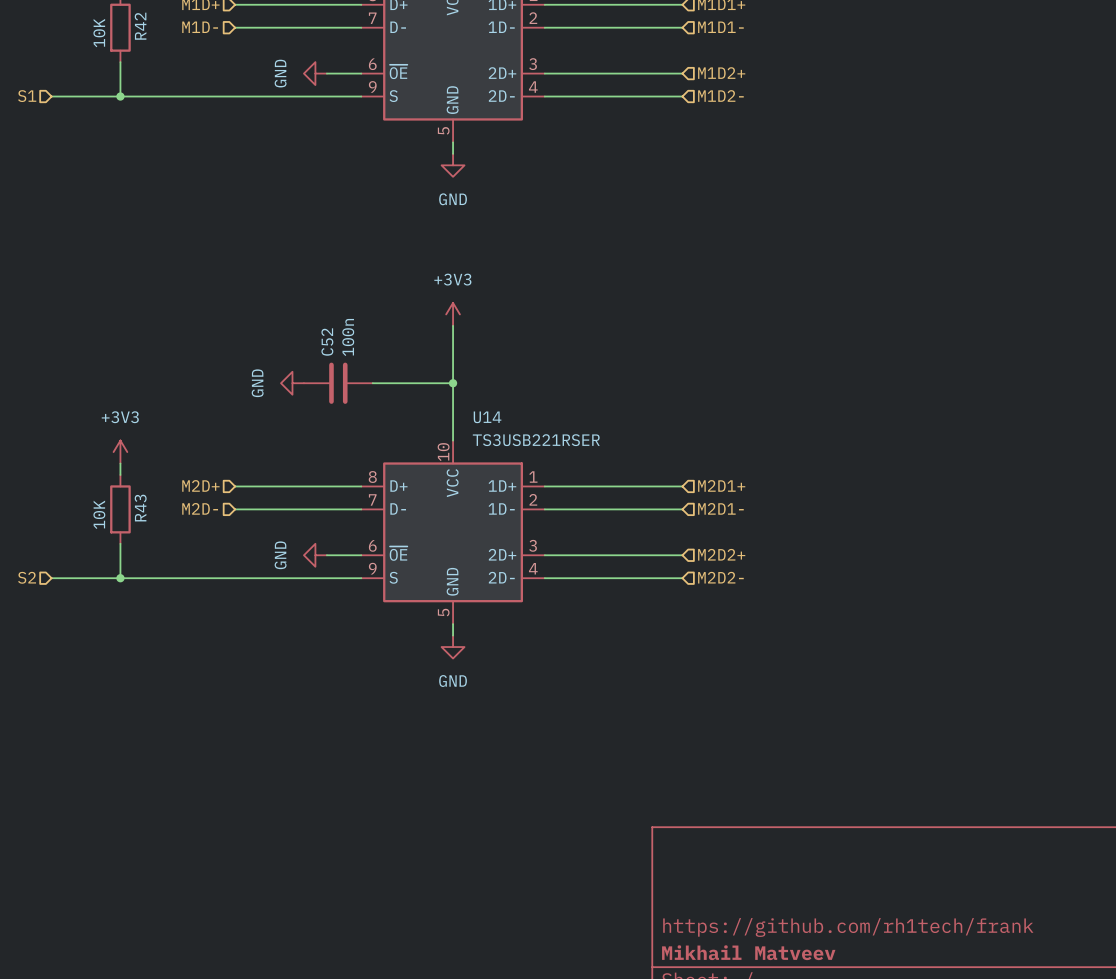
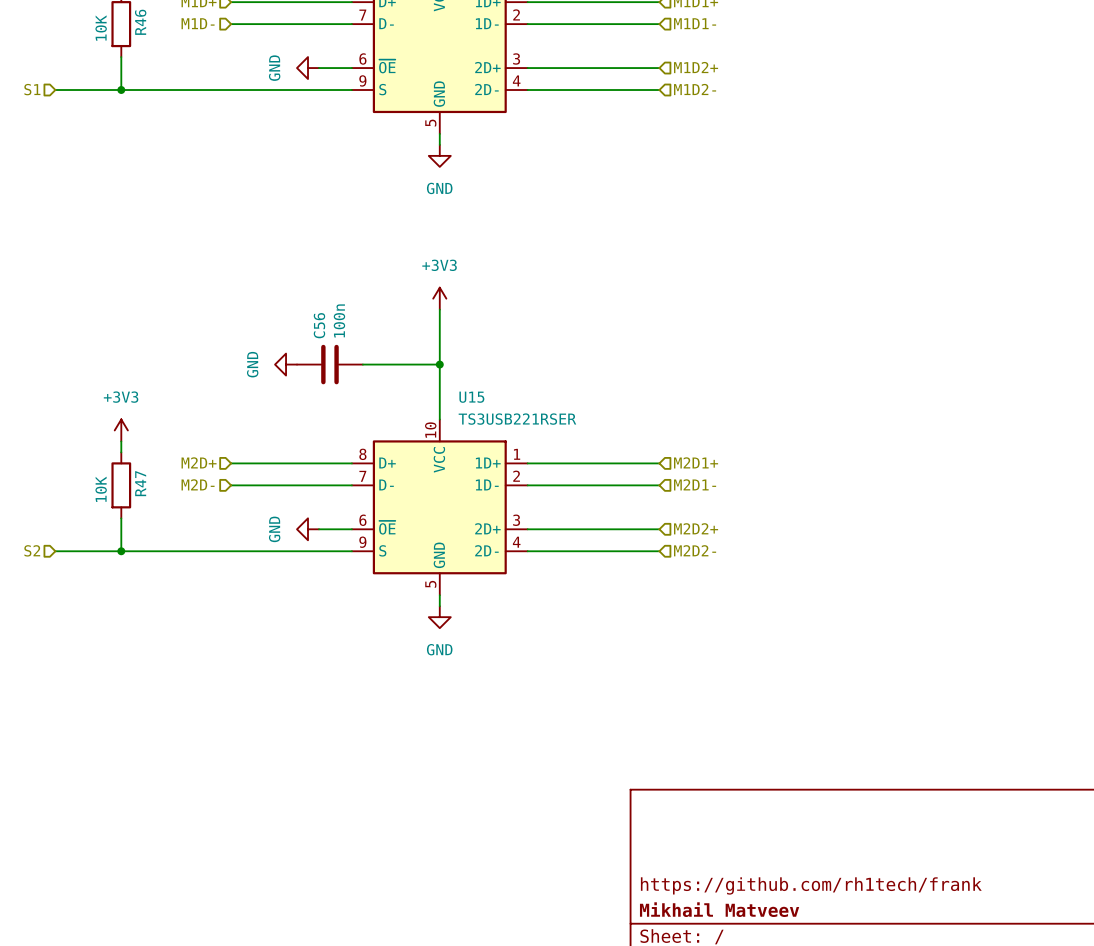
R42 name: R42 (140, 26) -> R46 (140, 22)
C52 name: C52 (327, 342) -> C56 (319, 325)
U14 name: U14 (487, 417) -> U15 (471, 397)
R43 name: R43 (140, 508) -> R47 (140, 483)

